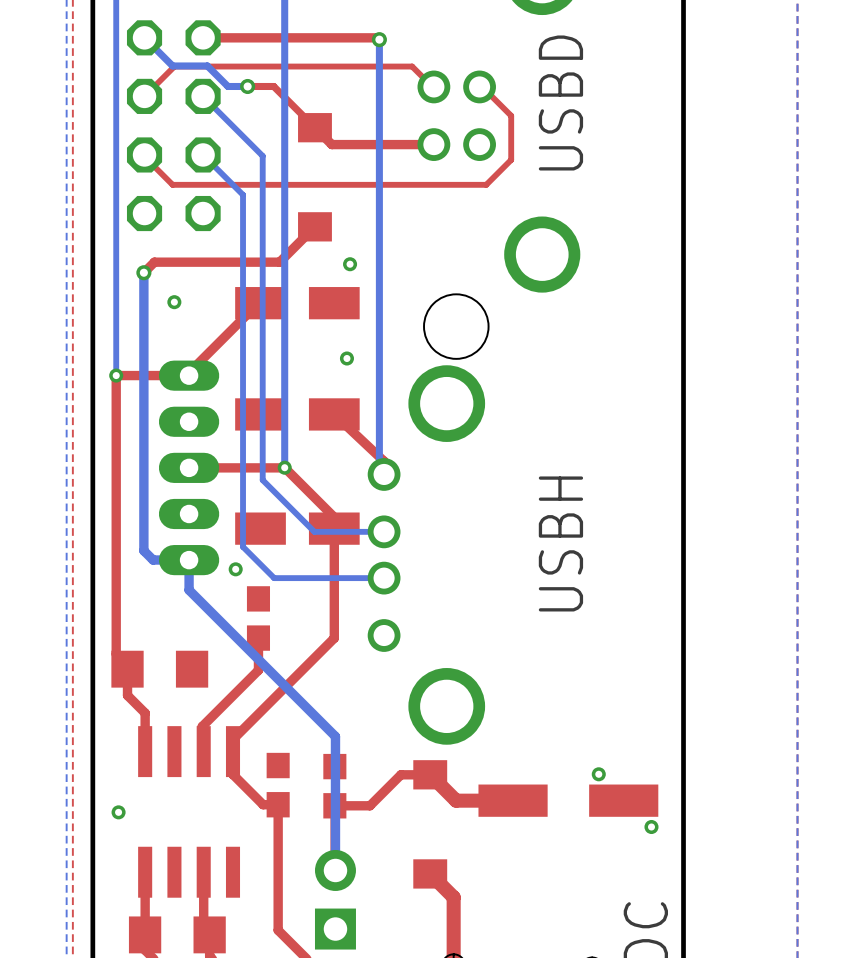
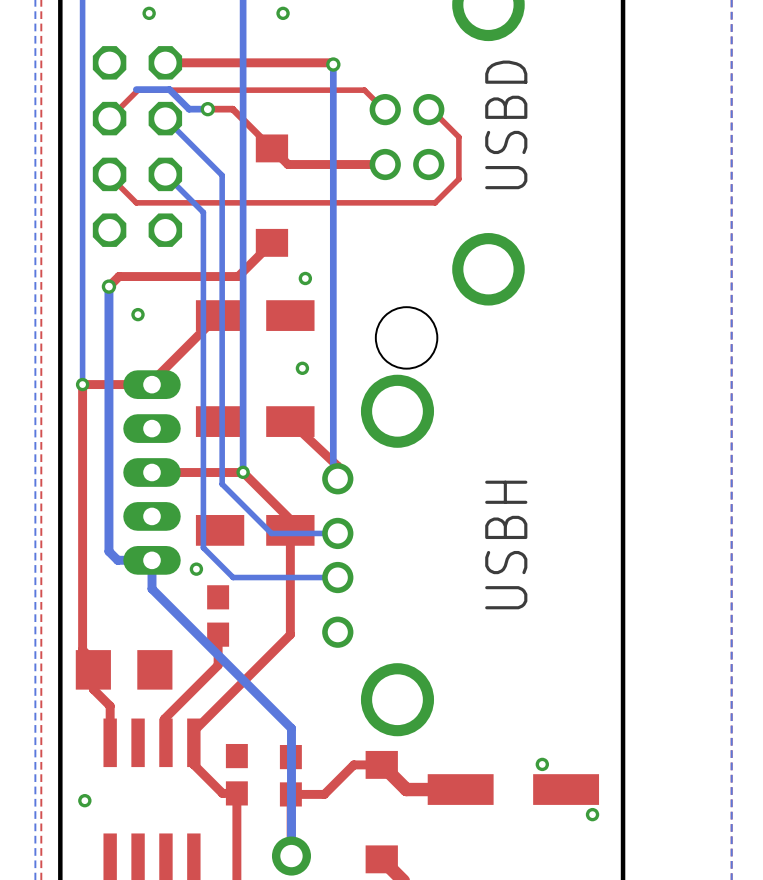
bottom track: (144, 37) (172, 65) -> none
part footprint: [111, 650, 209, 688] -> [75, 650, 173, 690]

